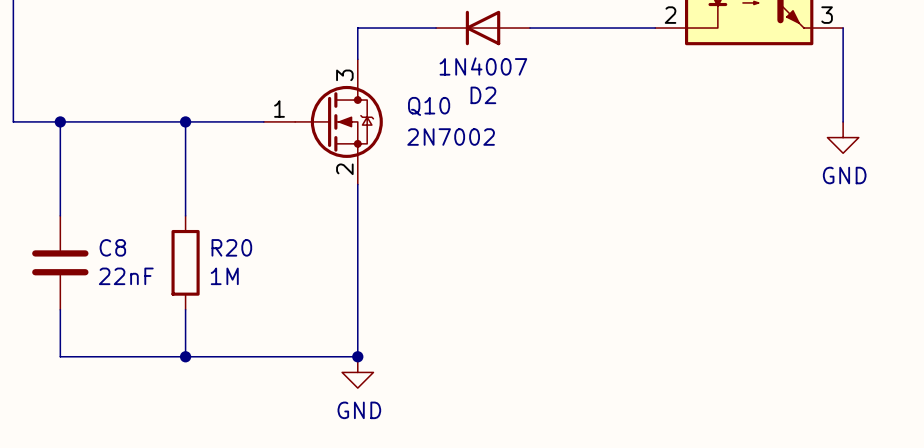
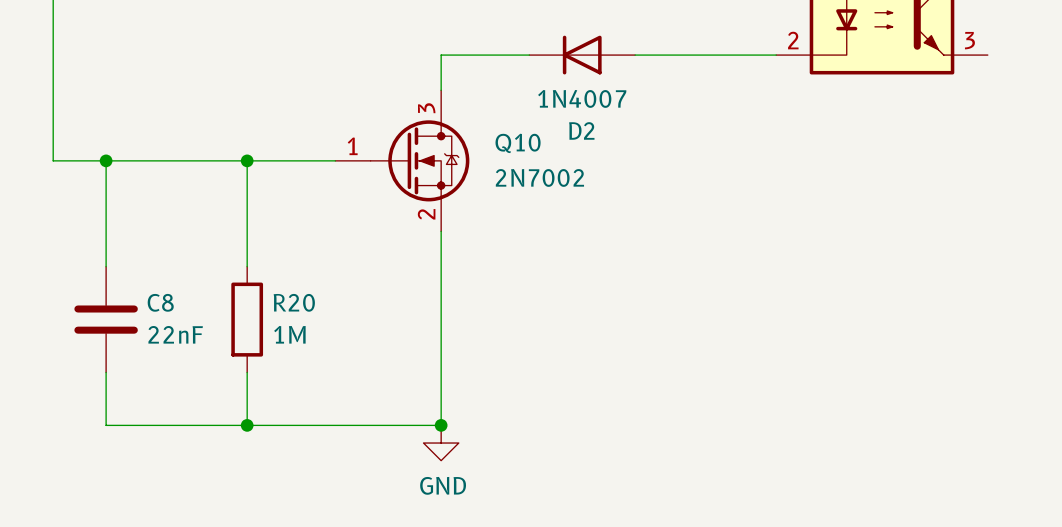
wire: (843, 28) (843, 121) -> none
power symbol: GND (843, 137) -> none

